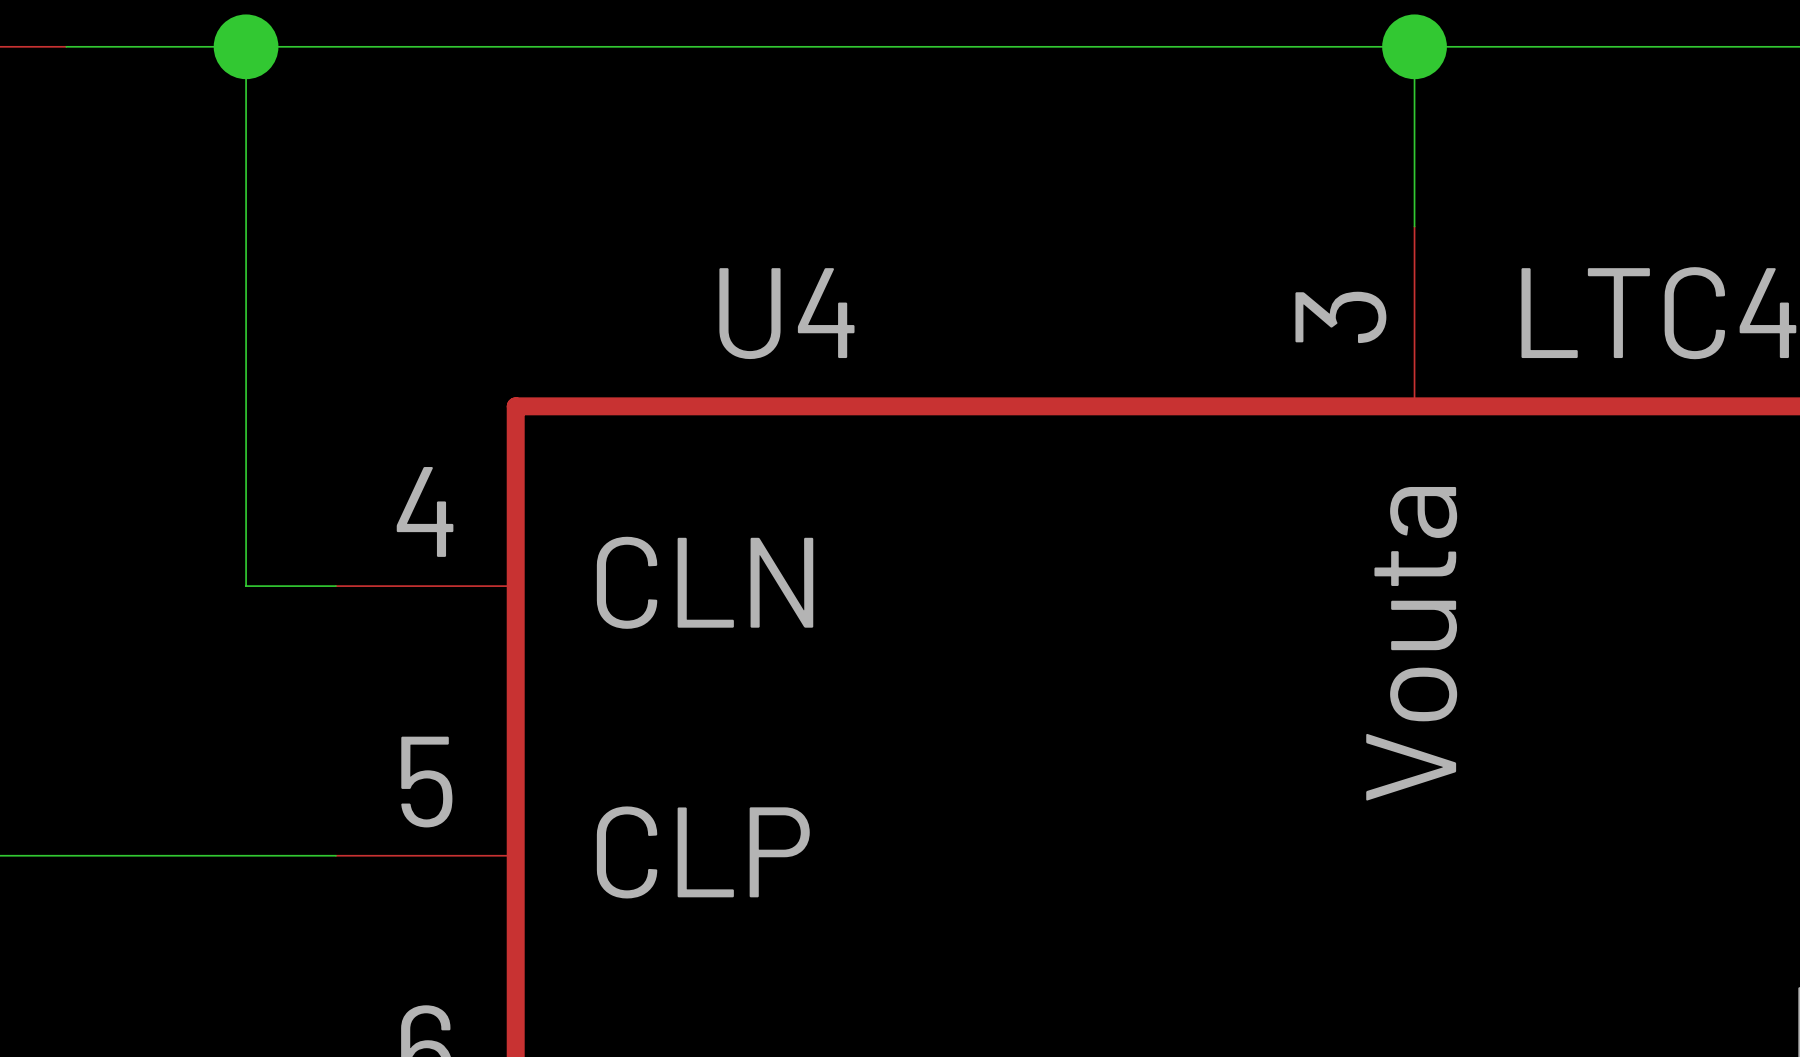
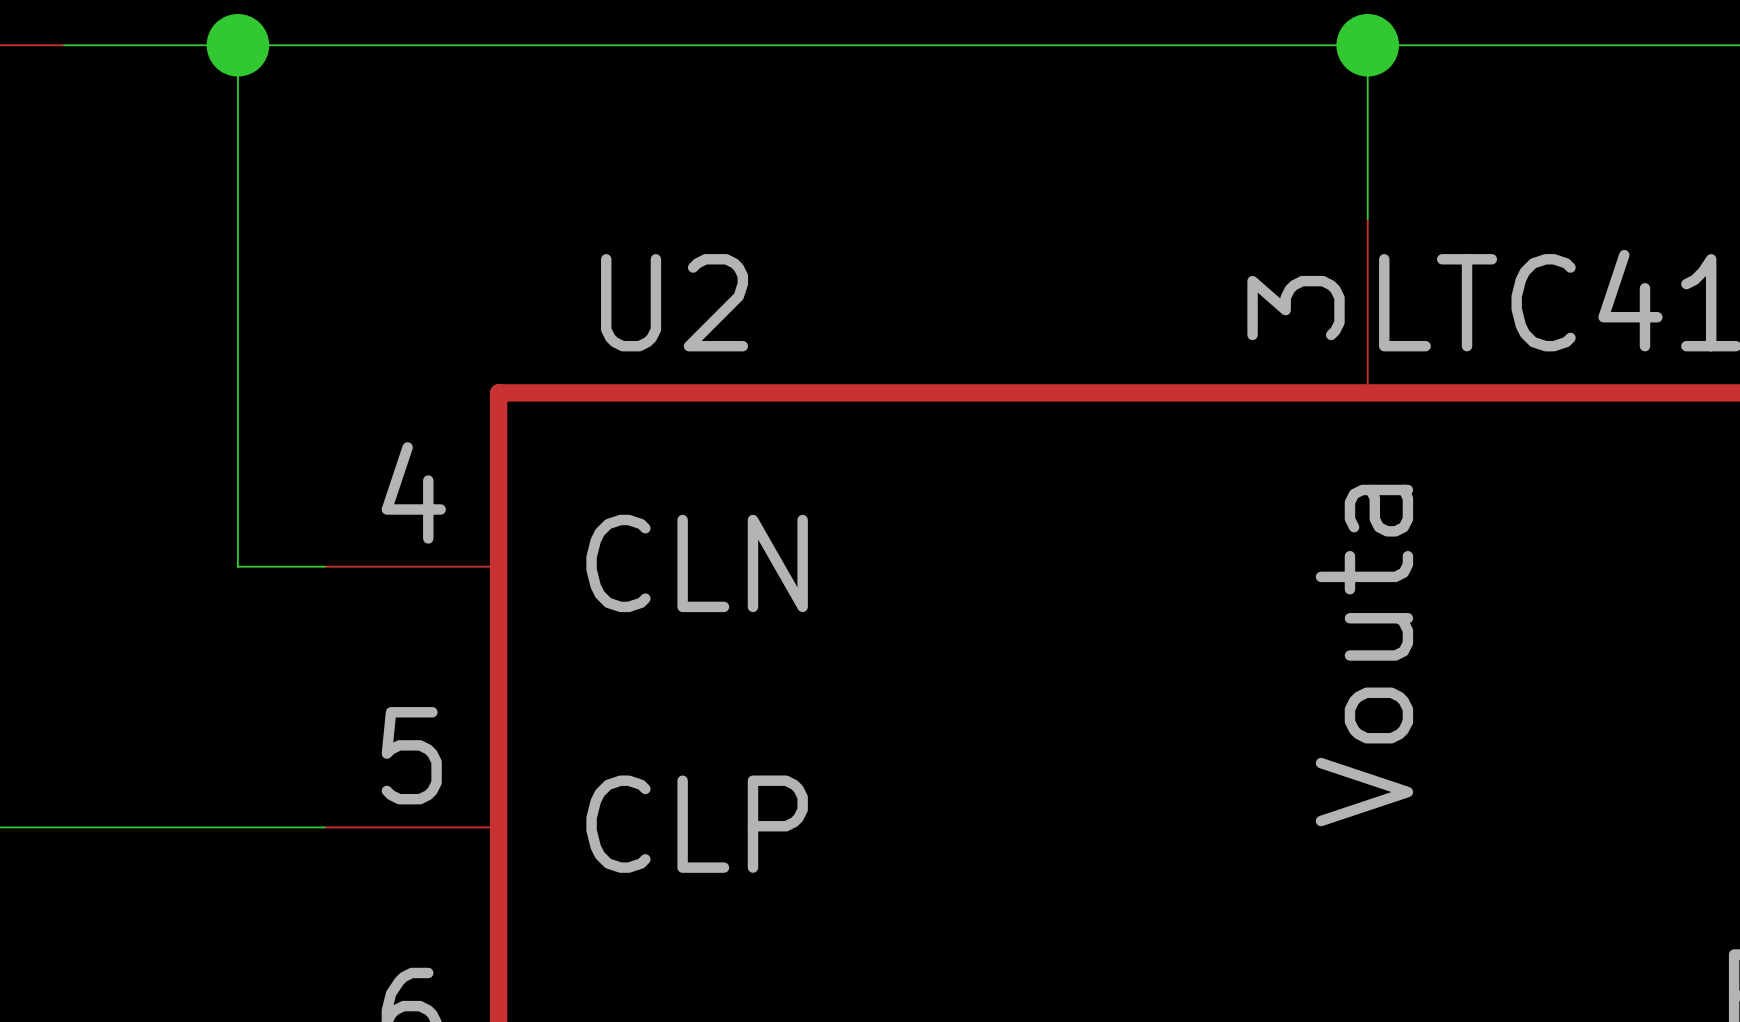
U4 name: U4 (786, 313) -> U2 (674, 302)

